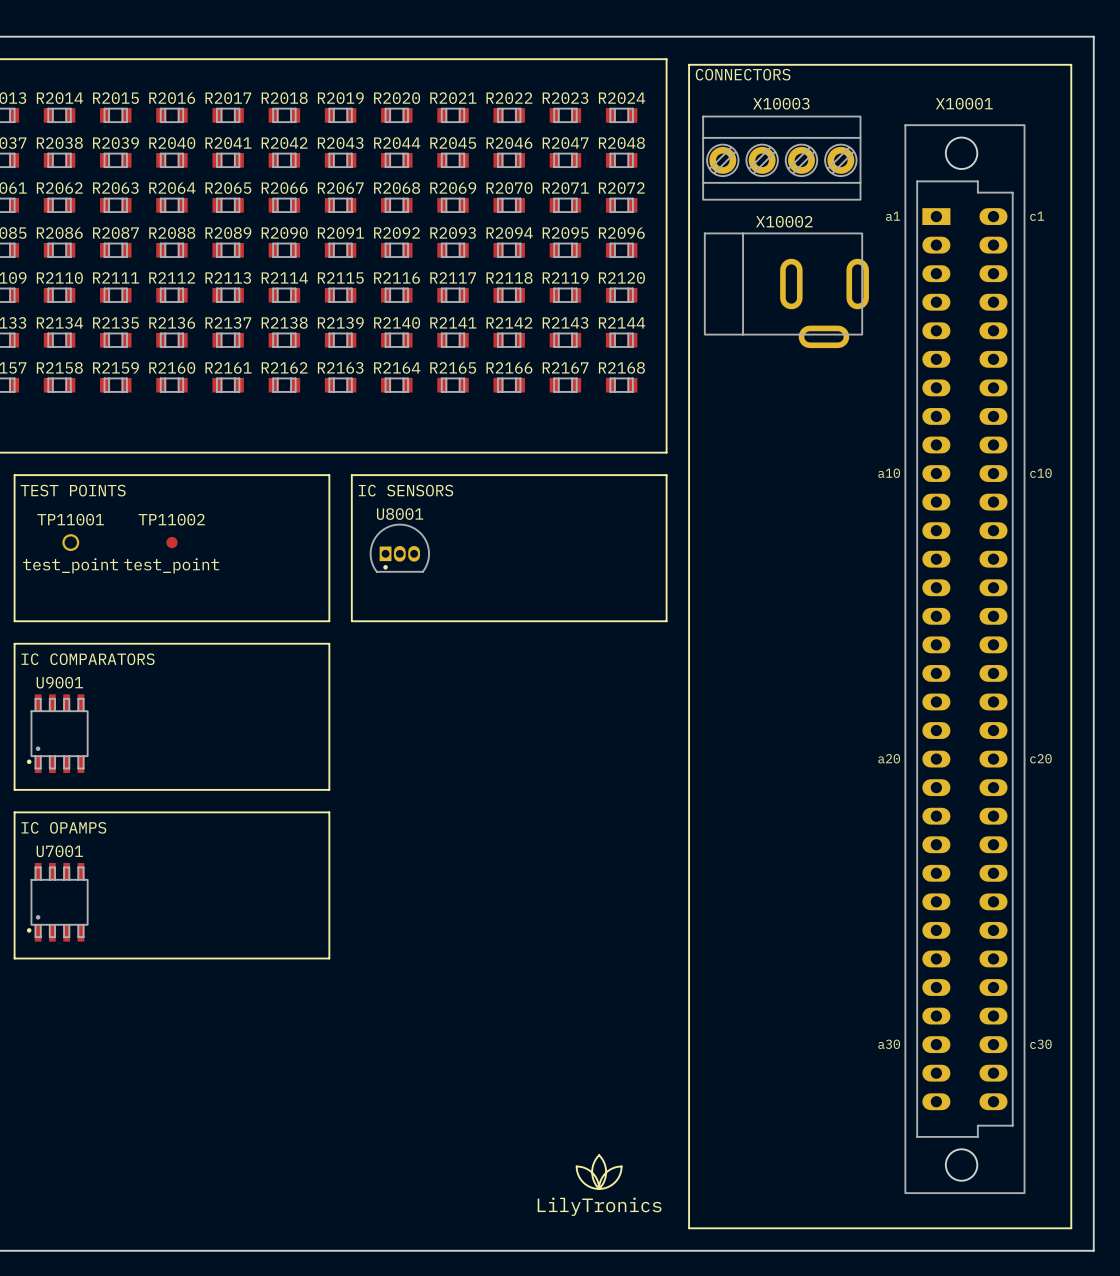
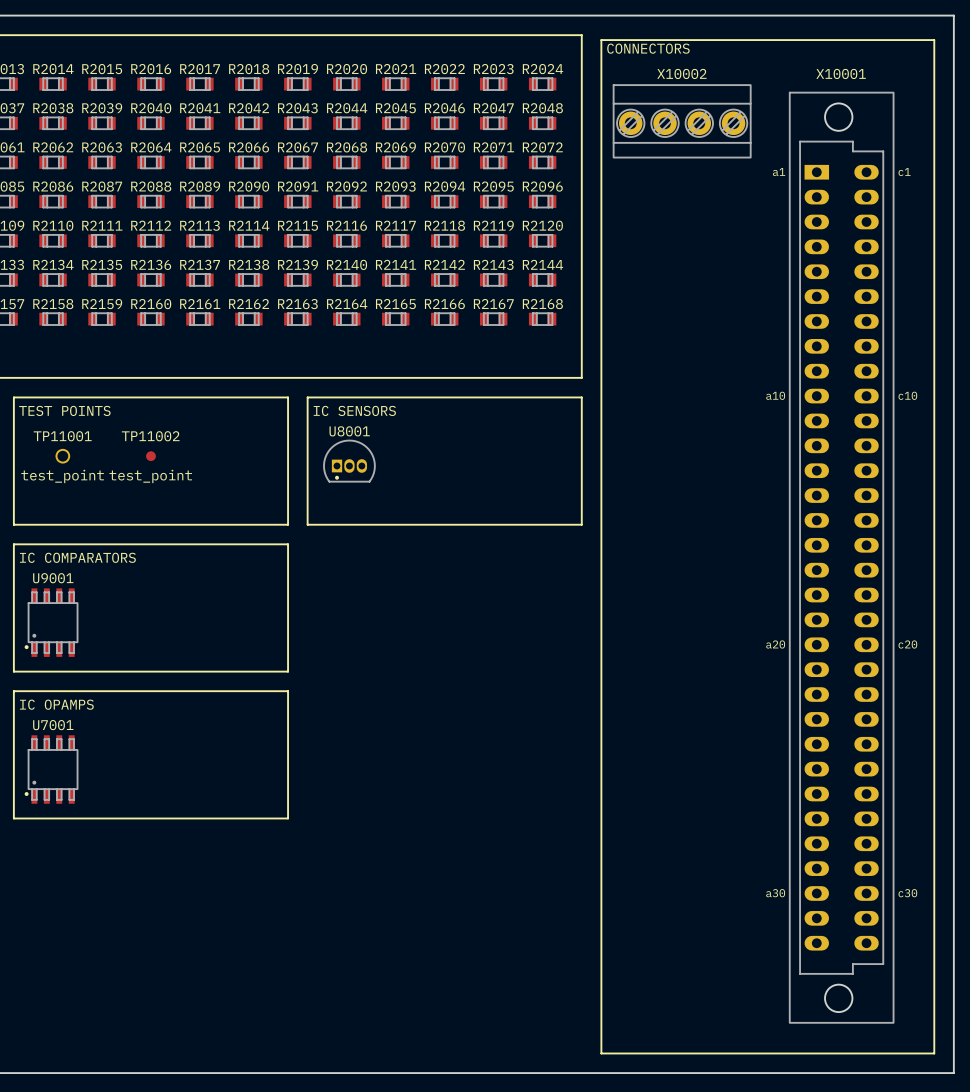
X10003 name: X10003 (781, 103) -> X10002 (681, 73)
X10002: (786, 290) -> none
drawing: [575, 1154, 623, 1190] -> none

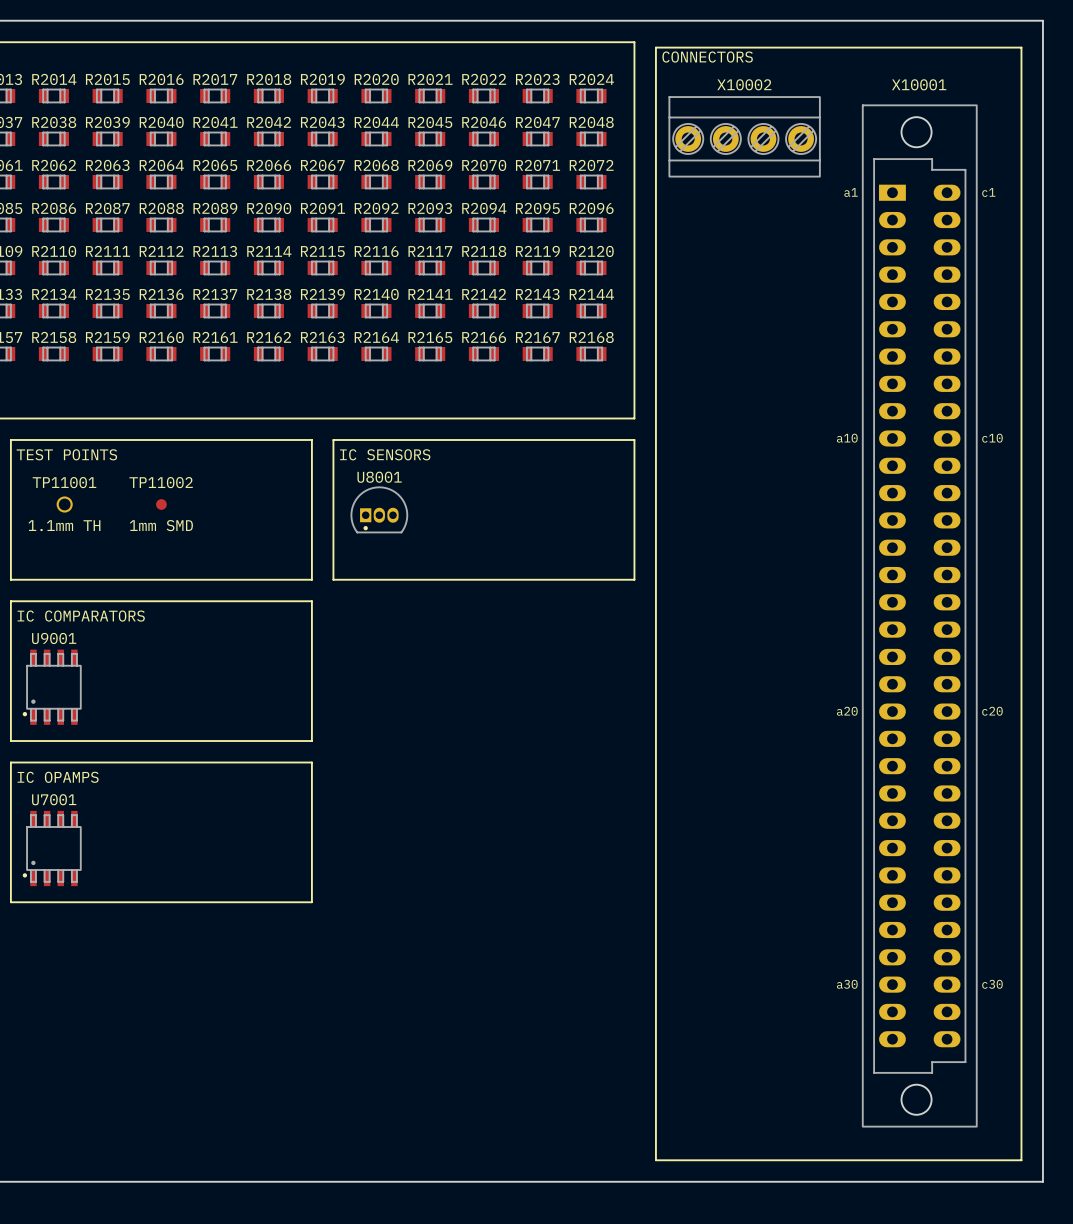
TP11001 value: test_point (62, 476) -> 1.1mm TH (64, 525)
TP11002 value: test_point (150, 476) -> 1mm SMD (161, 525)

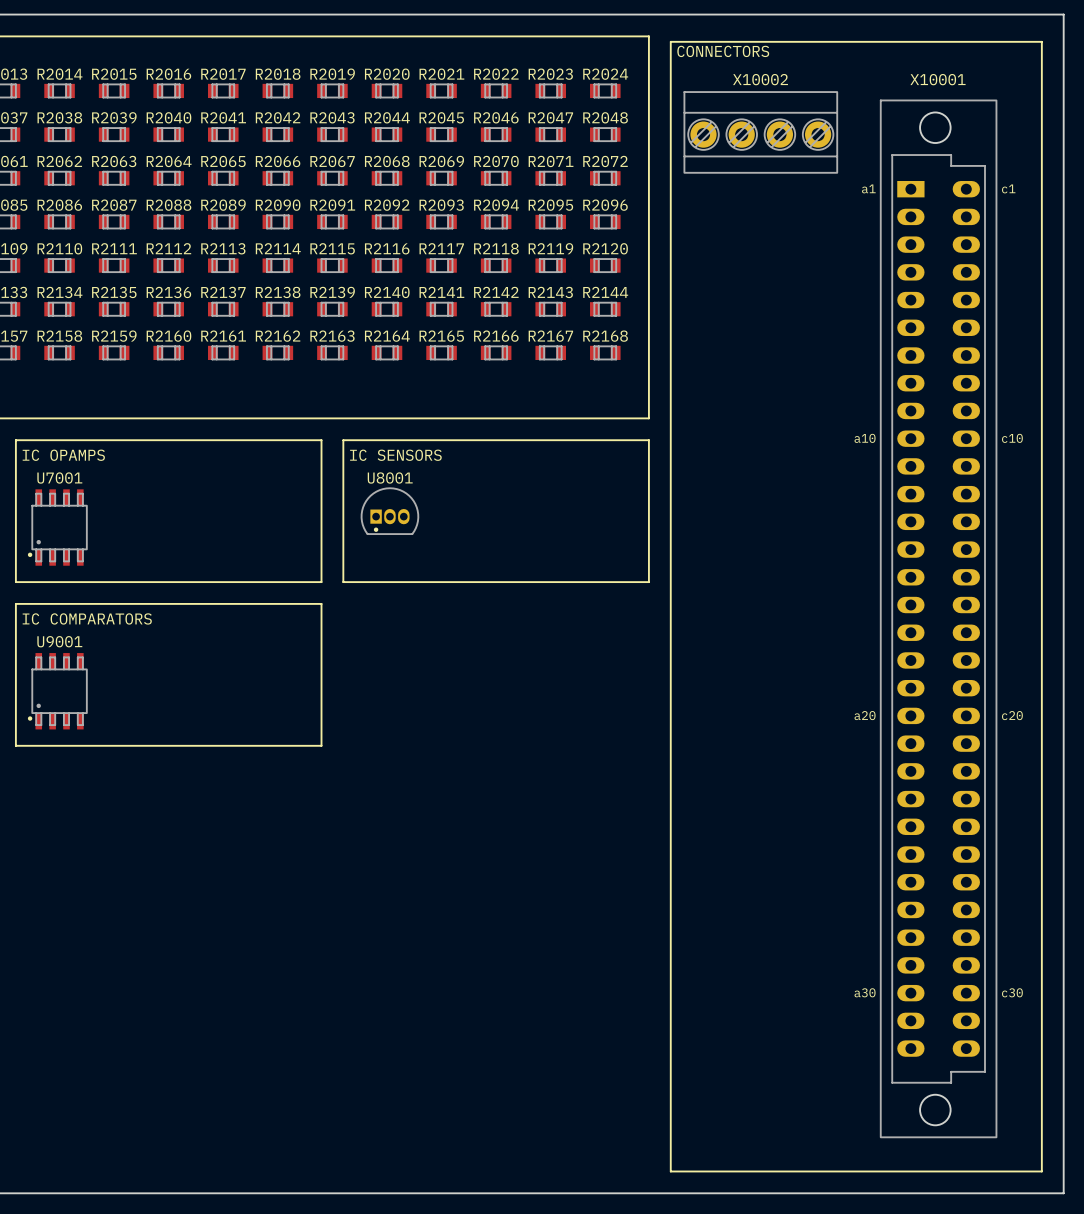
text: TEST POINTS (66, 454) -> IC OPAMPS (63, 455)
TP11001: 1.1mm TH (64, 504) -> none
TP11002: 1mm SMD (161, 504) -> none
line: (10, 762) (311, 762) (311, 902) (10, 902) (10, 762) -> none
text: IC OPAMPS (58, 777) -> none
U7001 position: (52, 848) -> (57, 527)

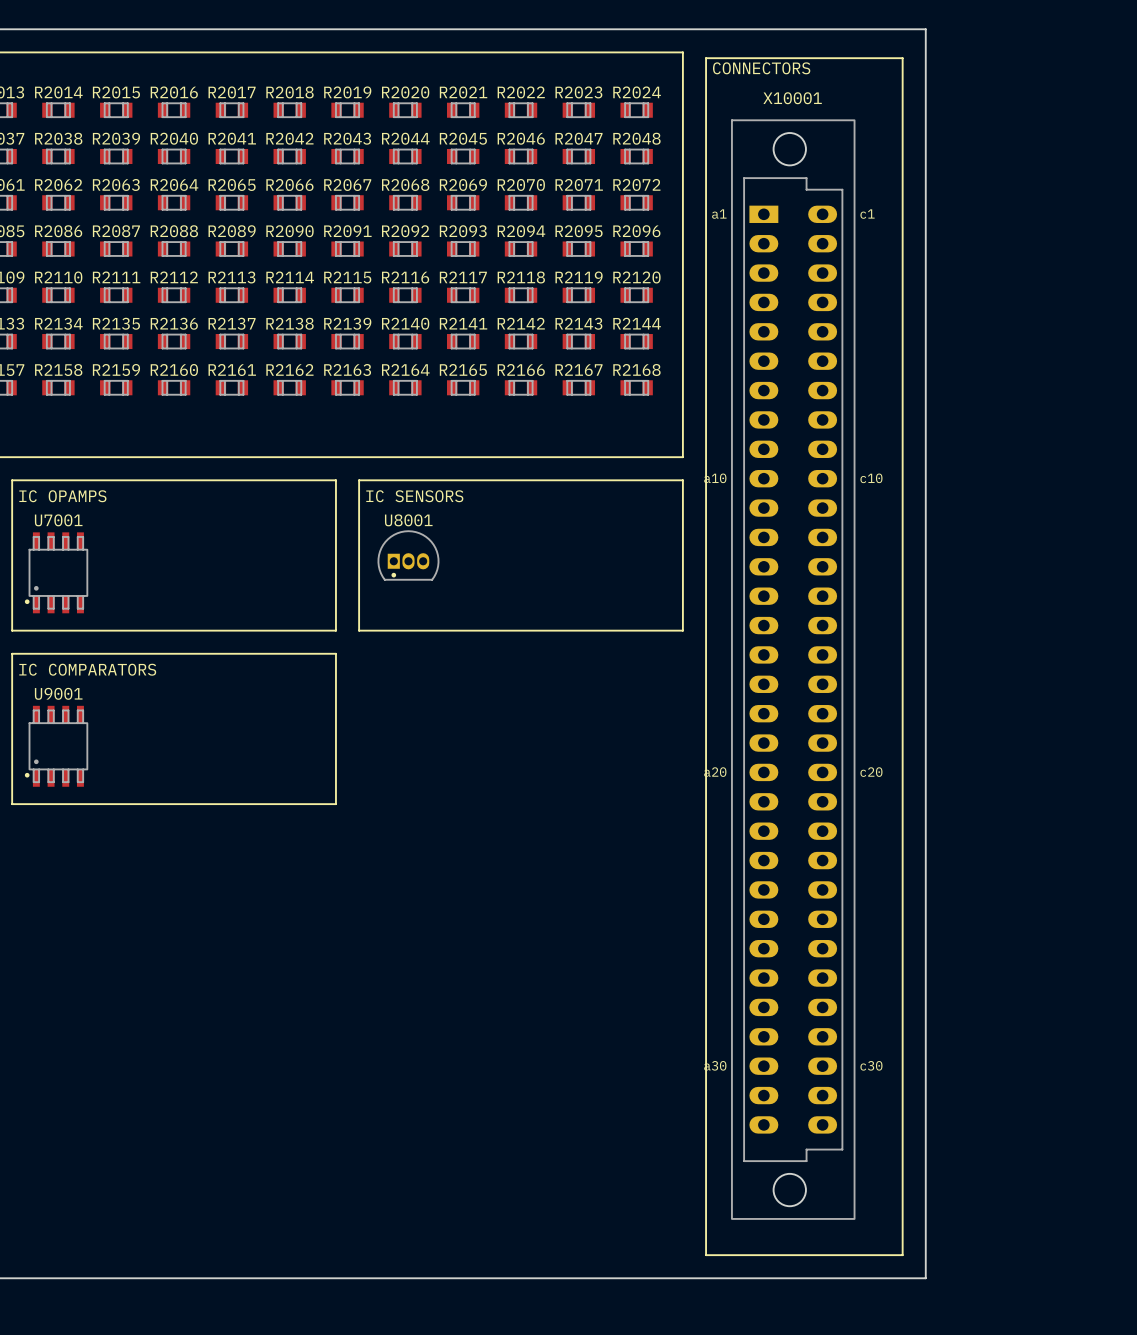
board edge: (878, 14) (1063, 14) (1063, 1193) (878, 1193) -> (925, 29) (925, 1278)
line: (856, 41) (1041, 41) (1041, 1171) (856, 1171) -> (902, 58) (902, 1255)
X10002: (760, 132) -> none
X10001 position: (938, 618) -> (793, 669)

